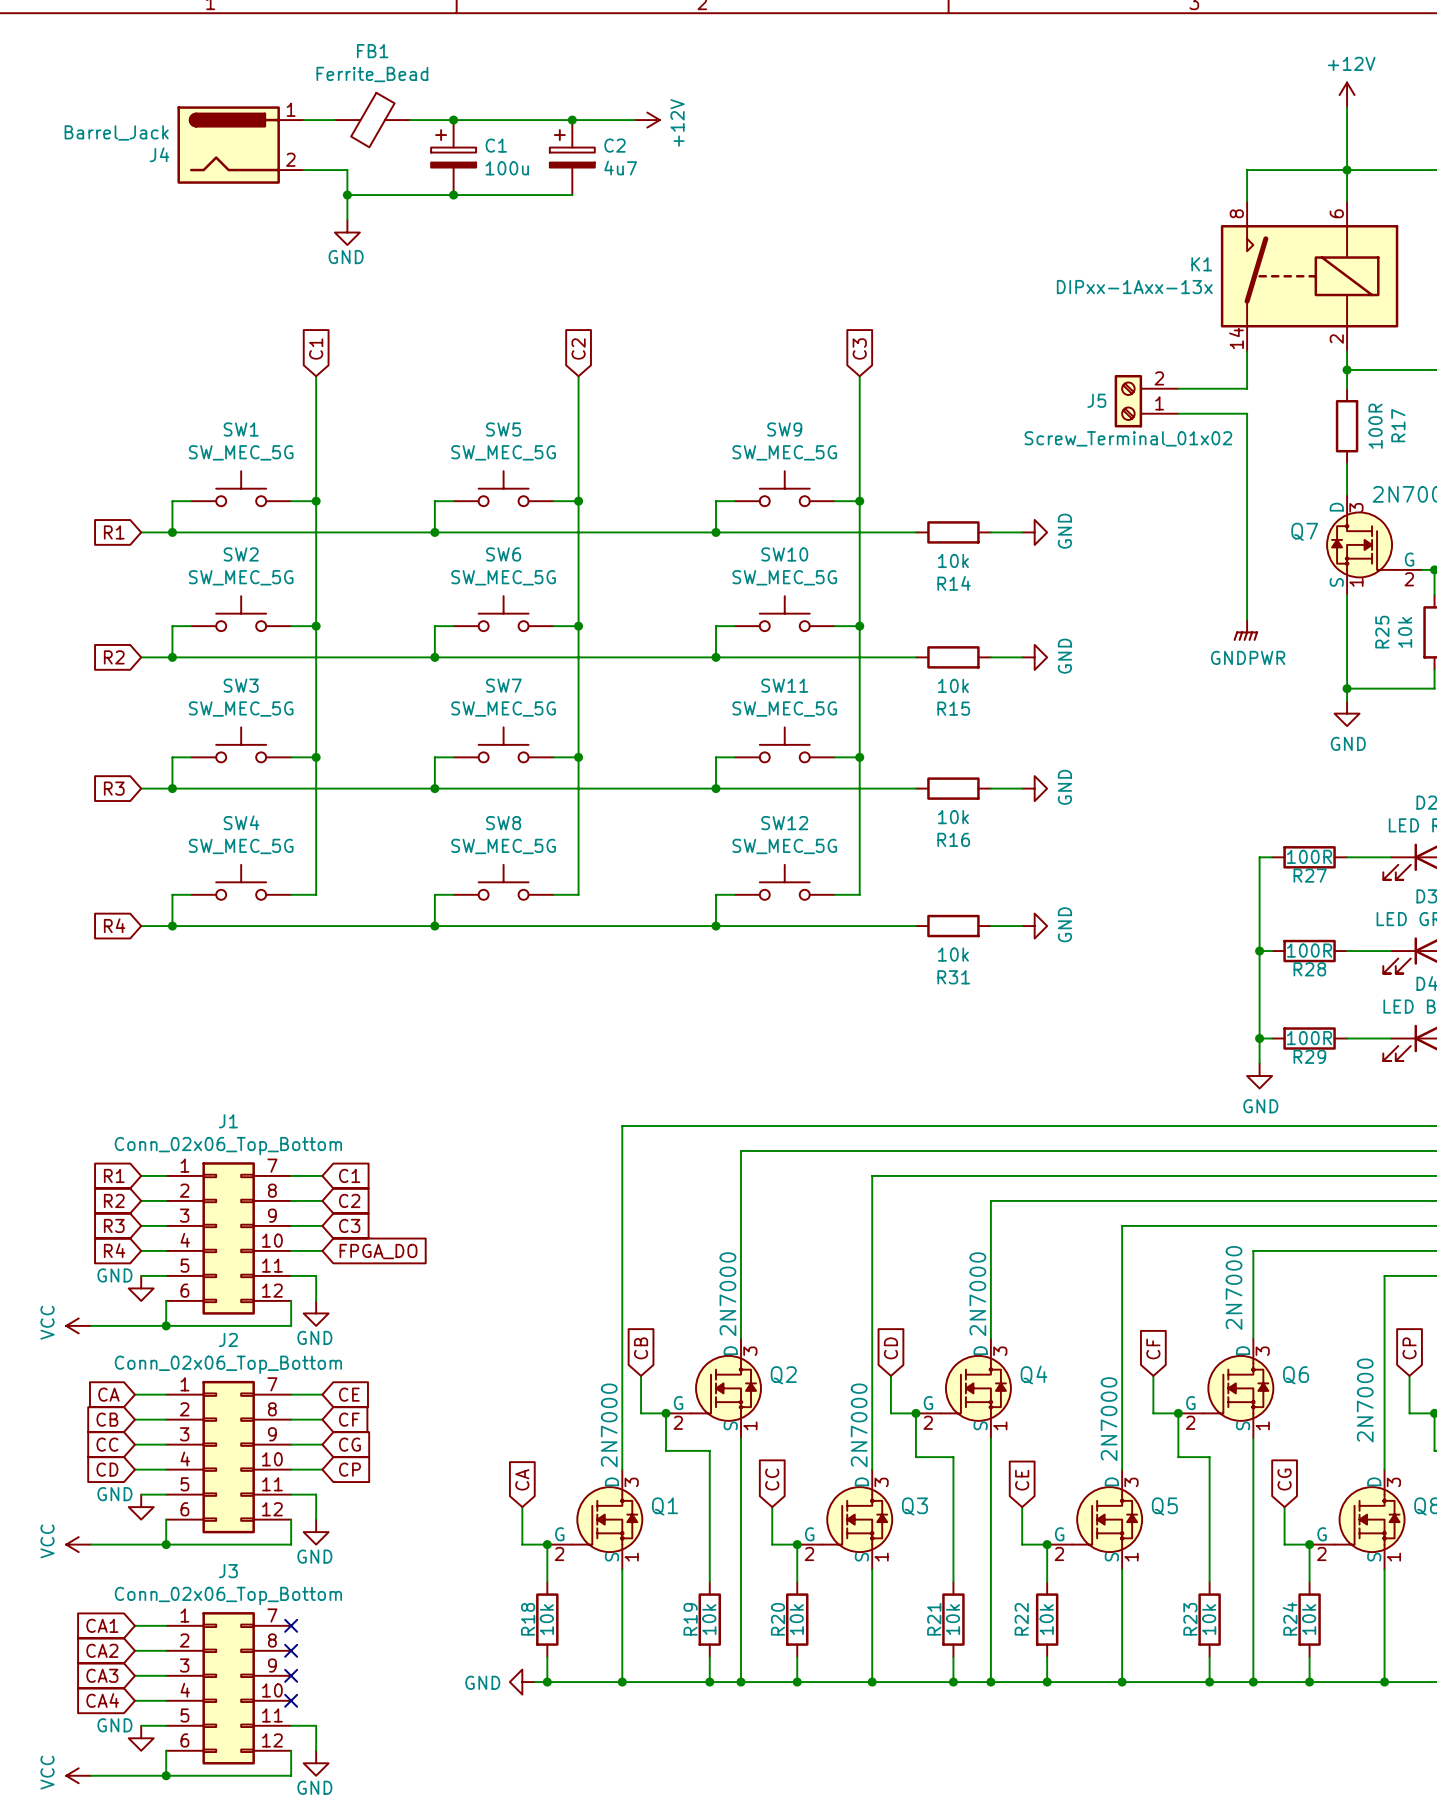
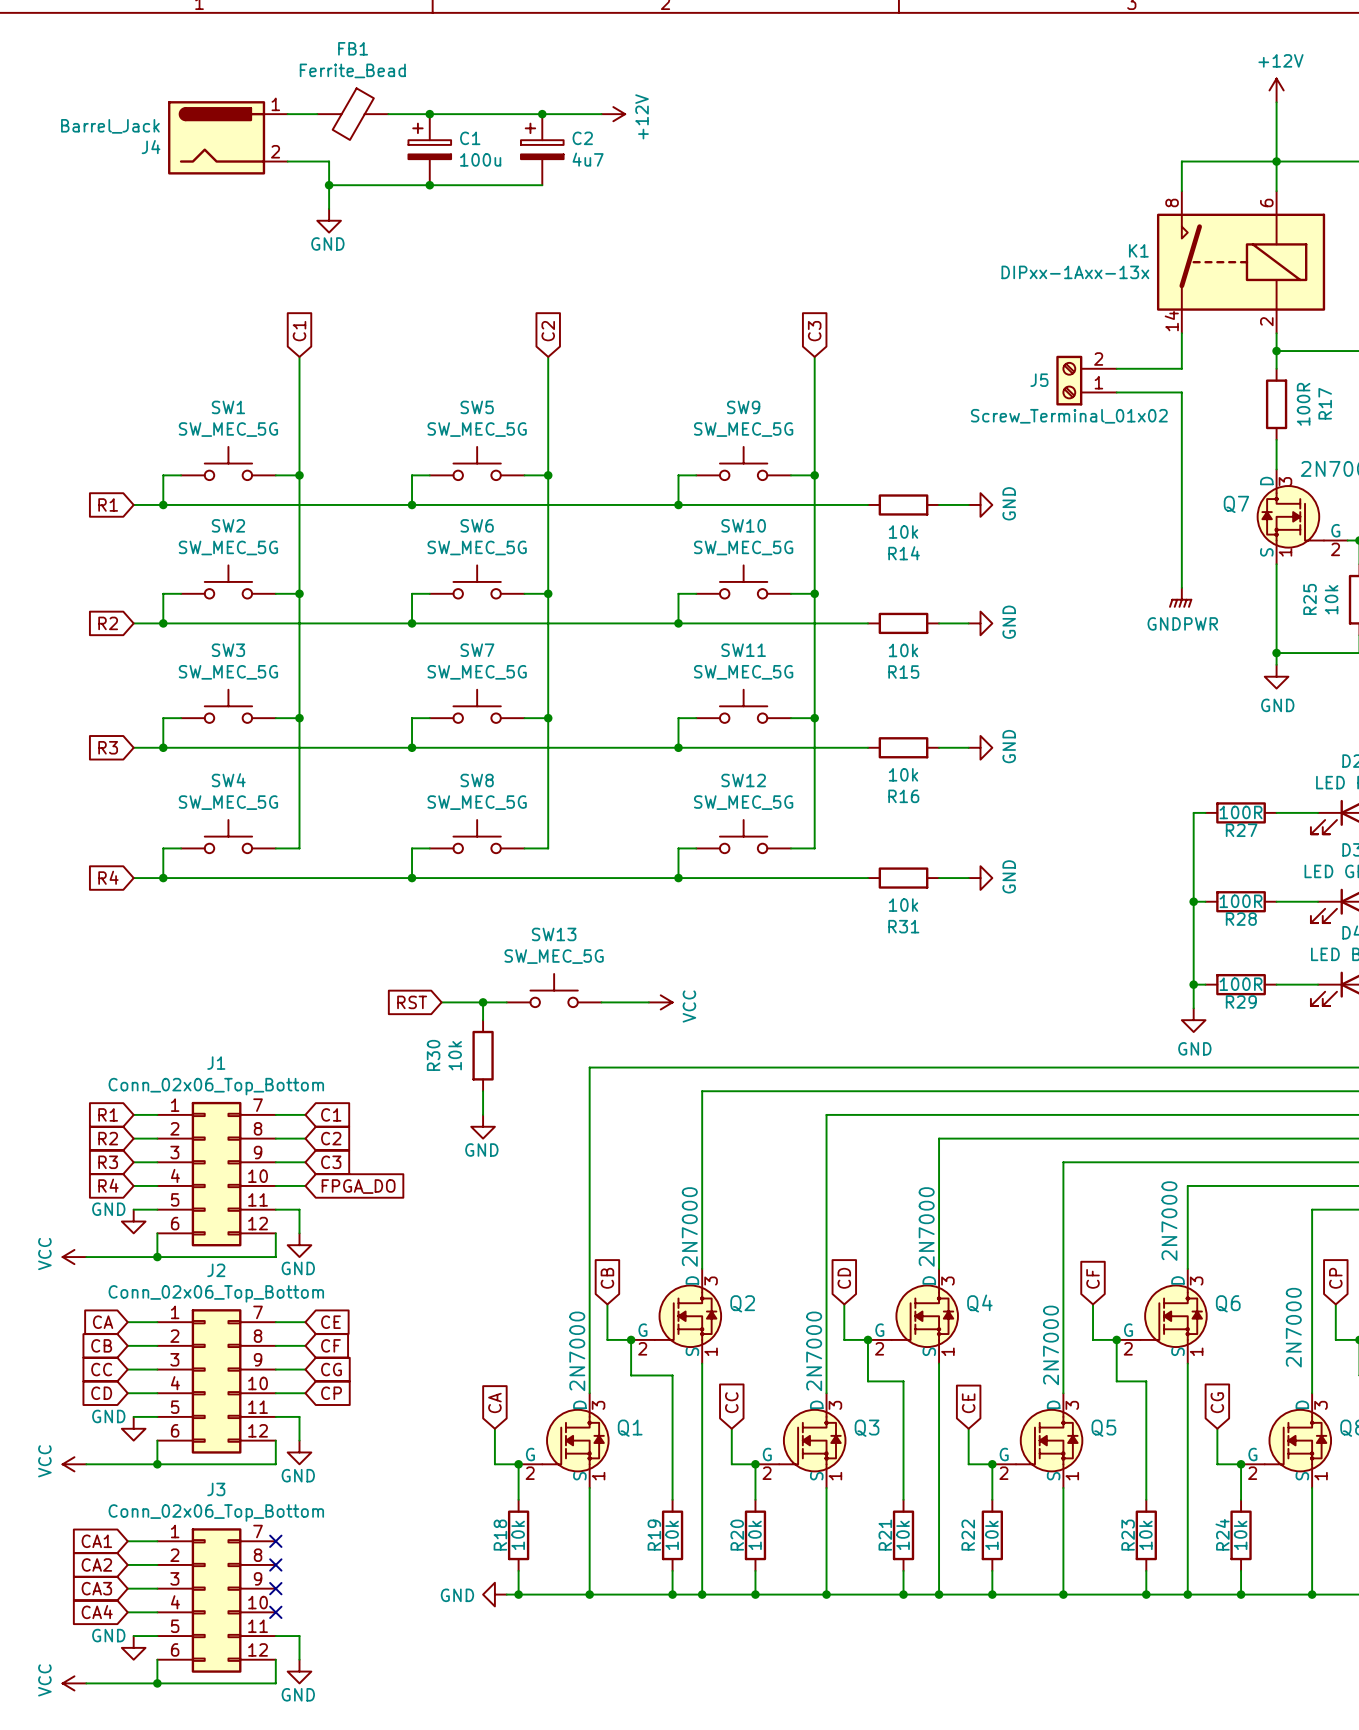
SW13: none -> SW_MEC_5G (554, 990)
global label: none -> RST (412, 1002)
wire: none -> (441, 1002) (506, 1002)
wire: none -> (483, 1002) (483, 1020)
junction: none -> (483, 1002)
wire: none -> (601, 1002) (648, 1002)
power symbol: none -> VCC (660, 1002)
R30: none -> 10k (483, 1055)
wire: none -> (483, 1091) (483, 1114)
power symbol: none -> GND (483, 1126)

